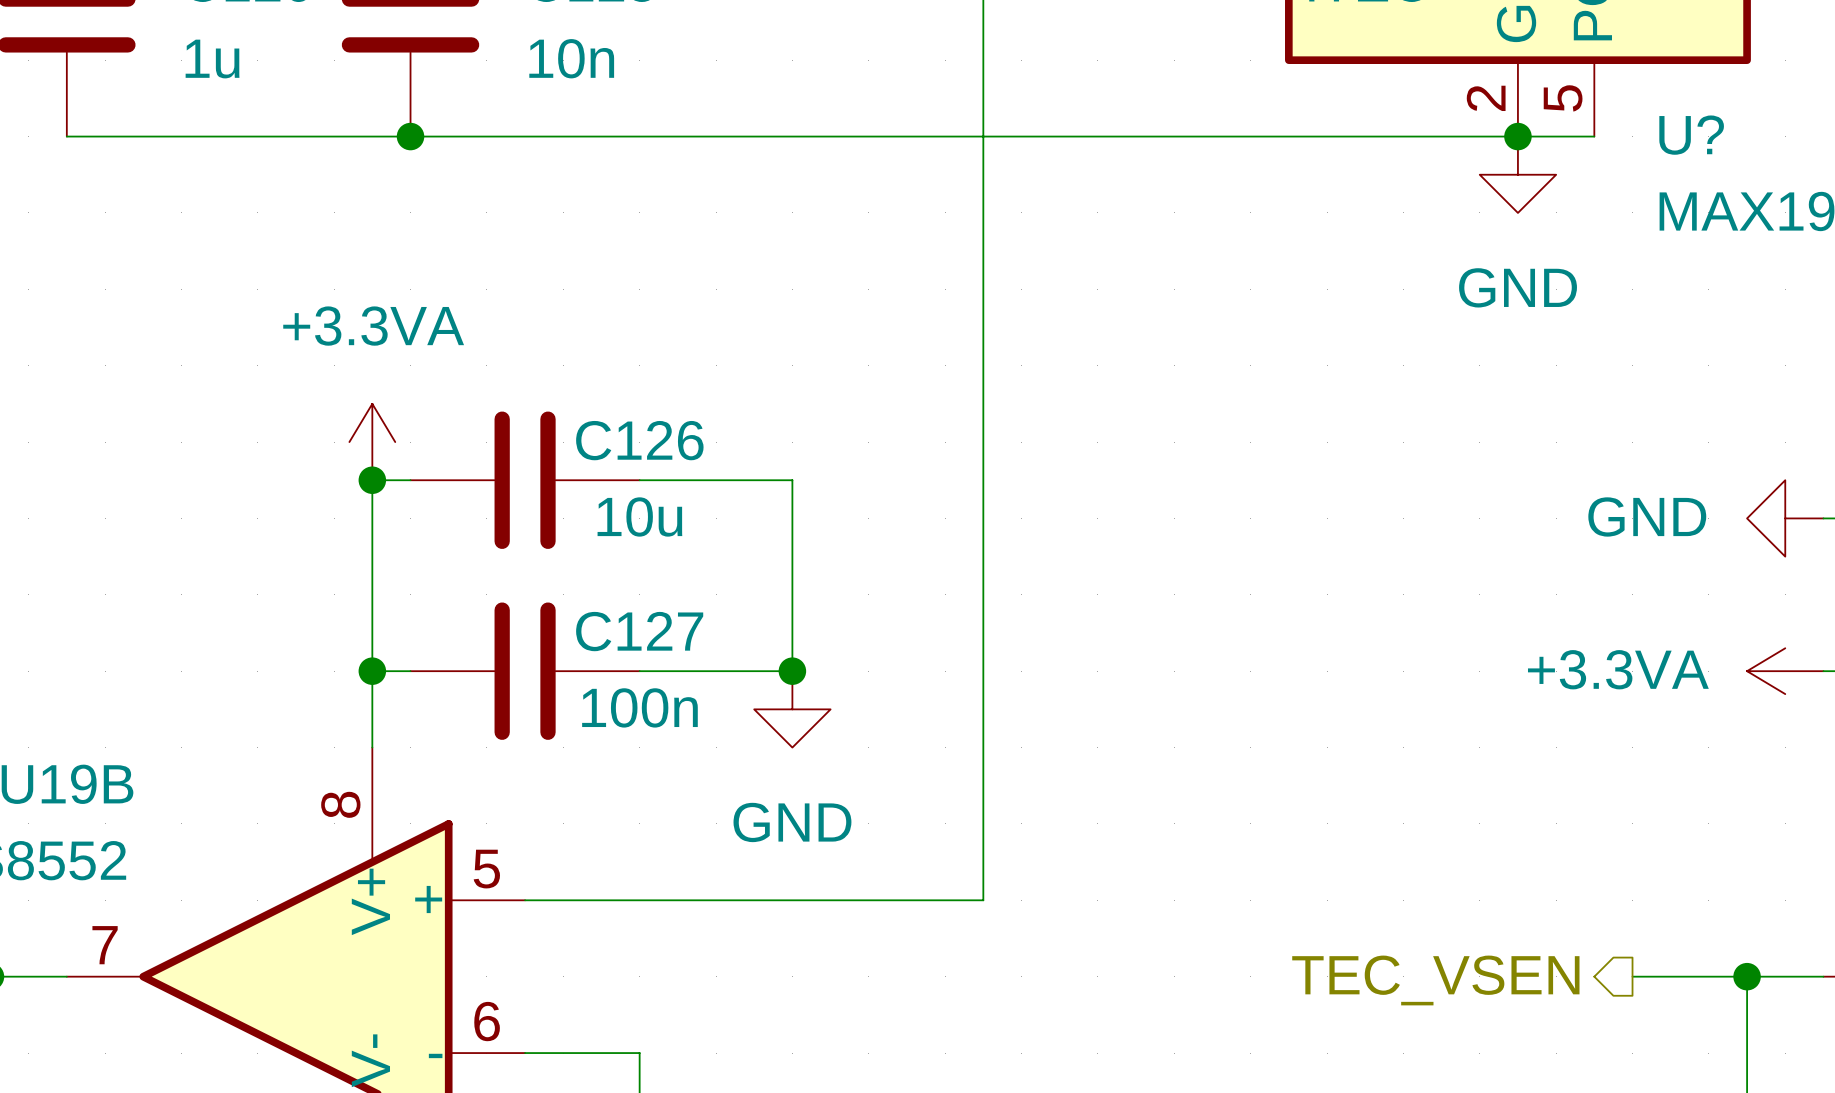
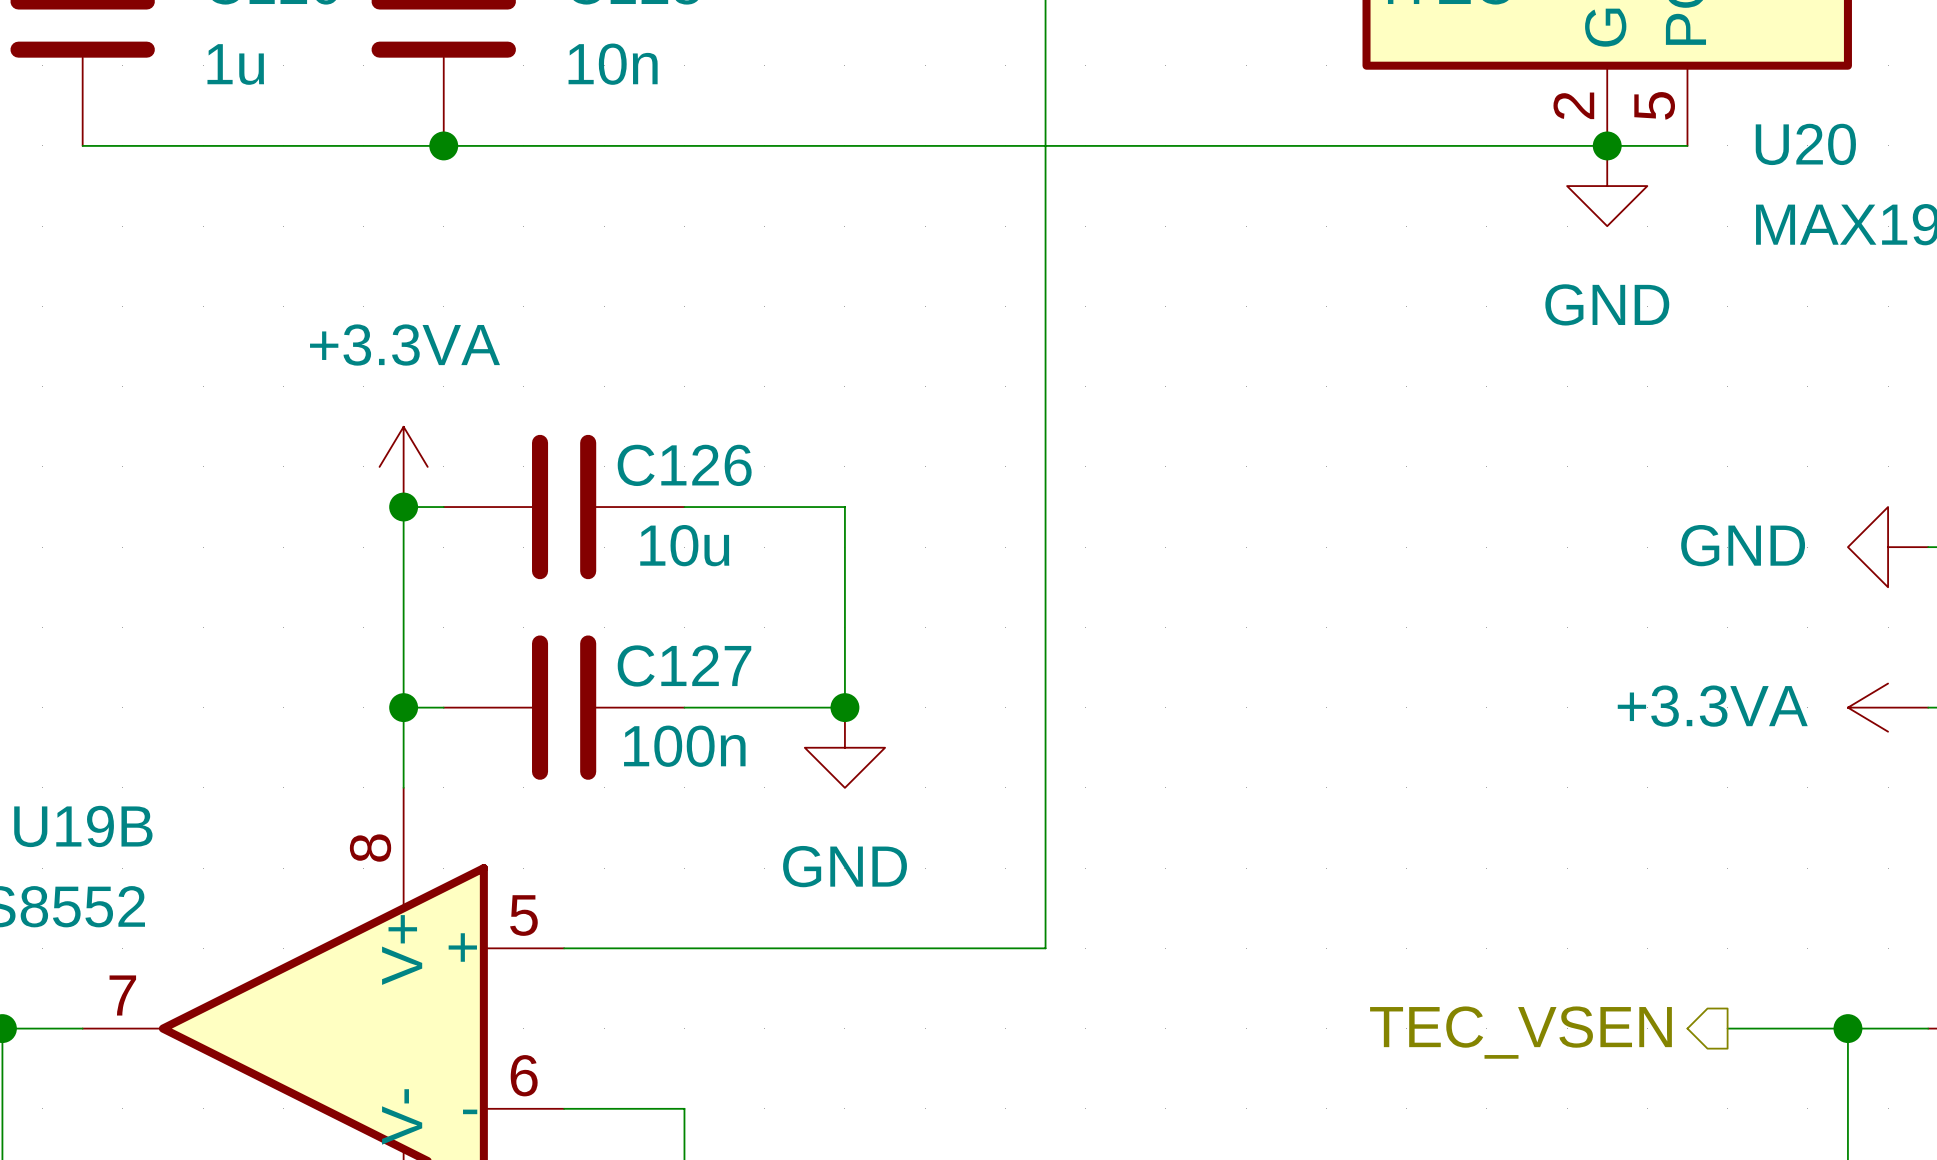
U? name: U? (1691, 135) -> U20 (1805, 144)

